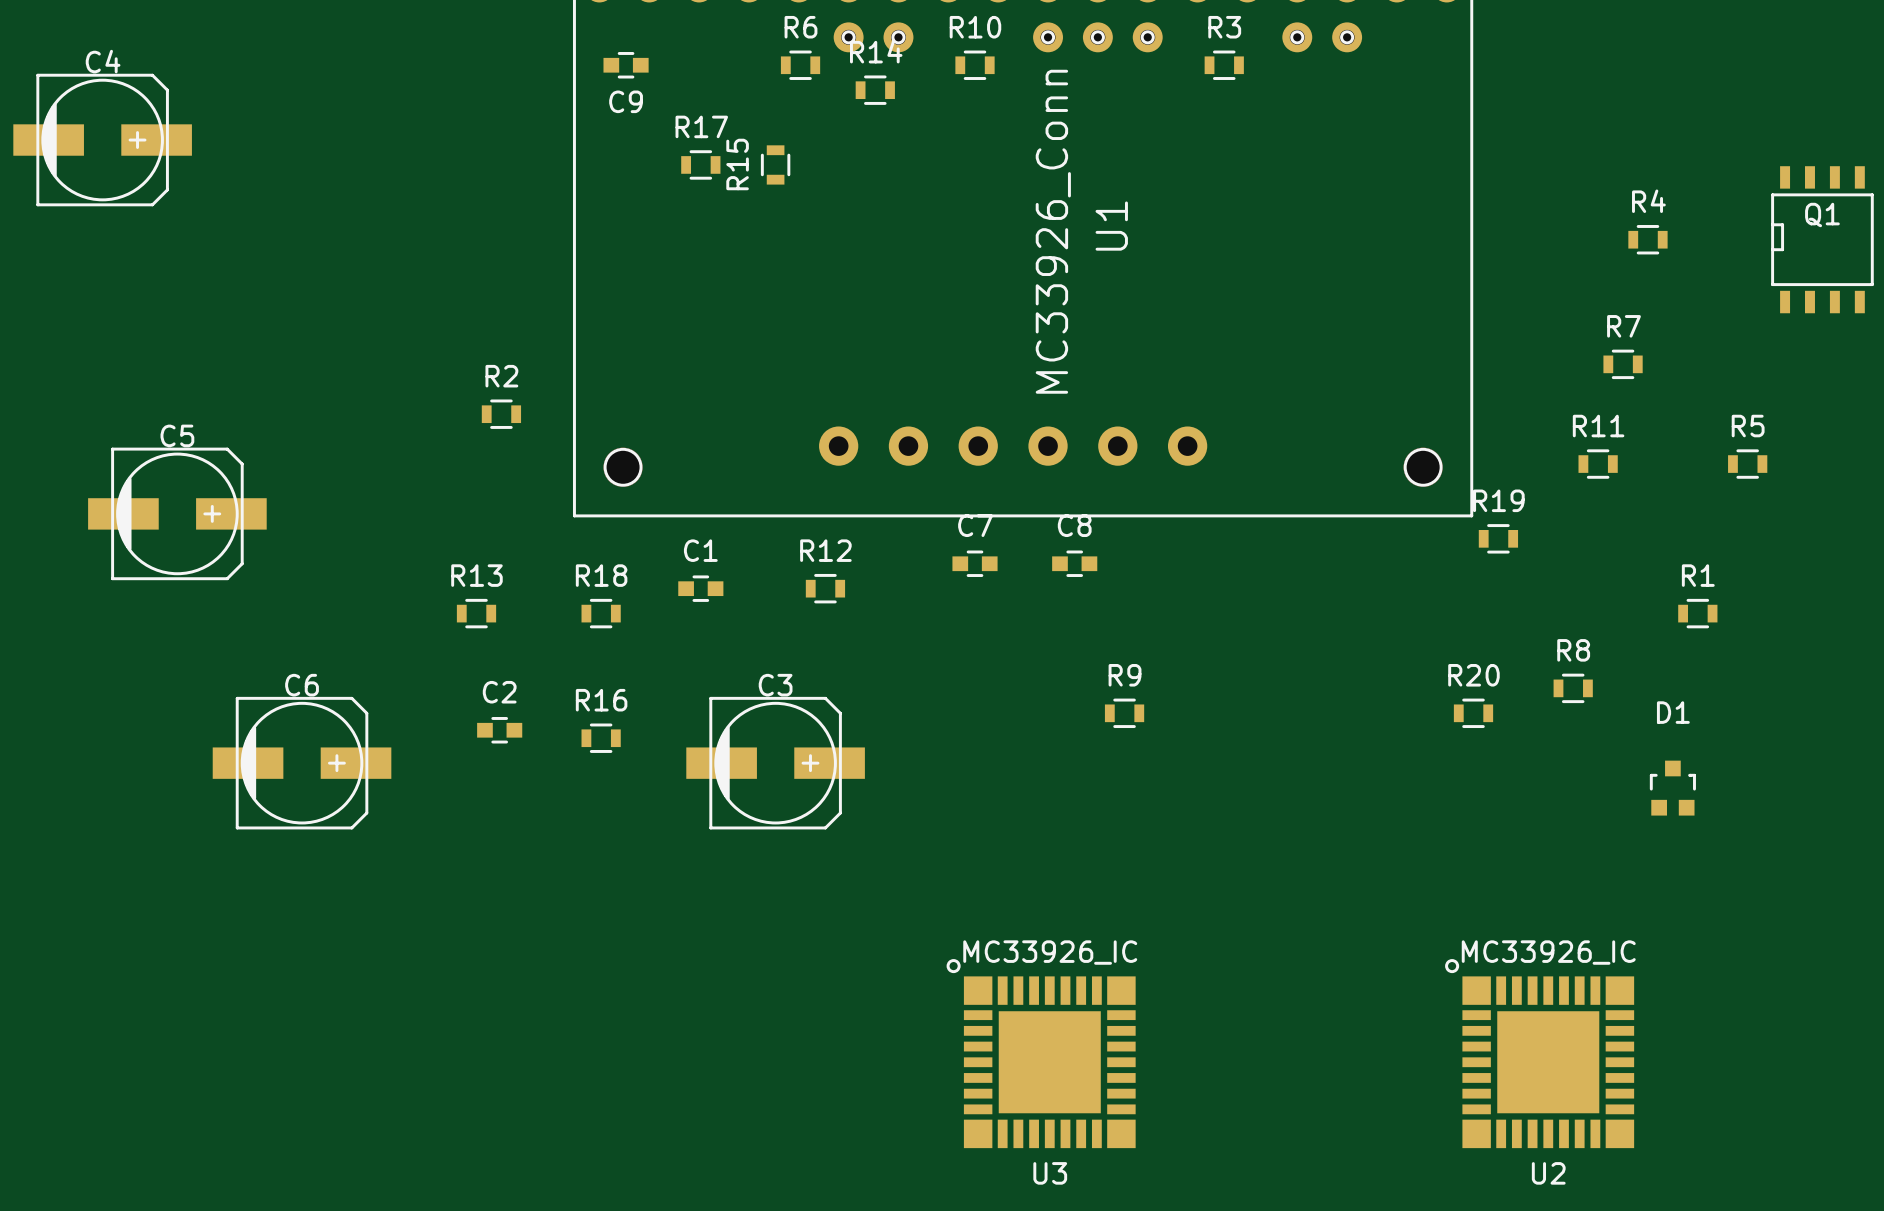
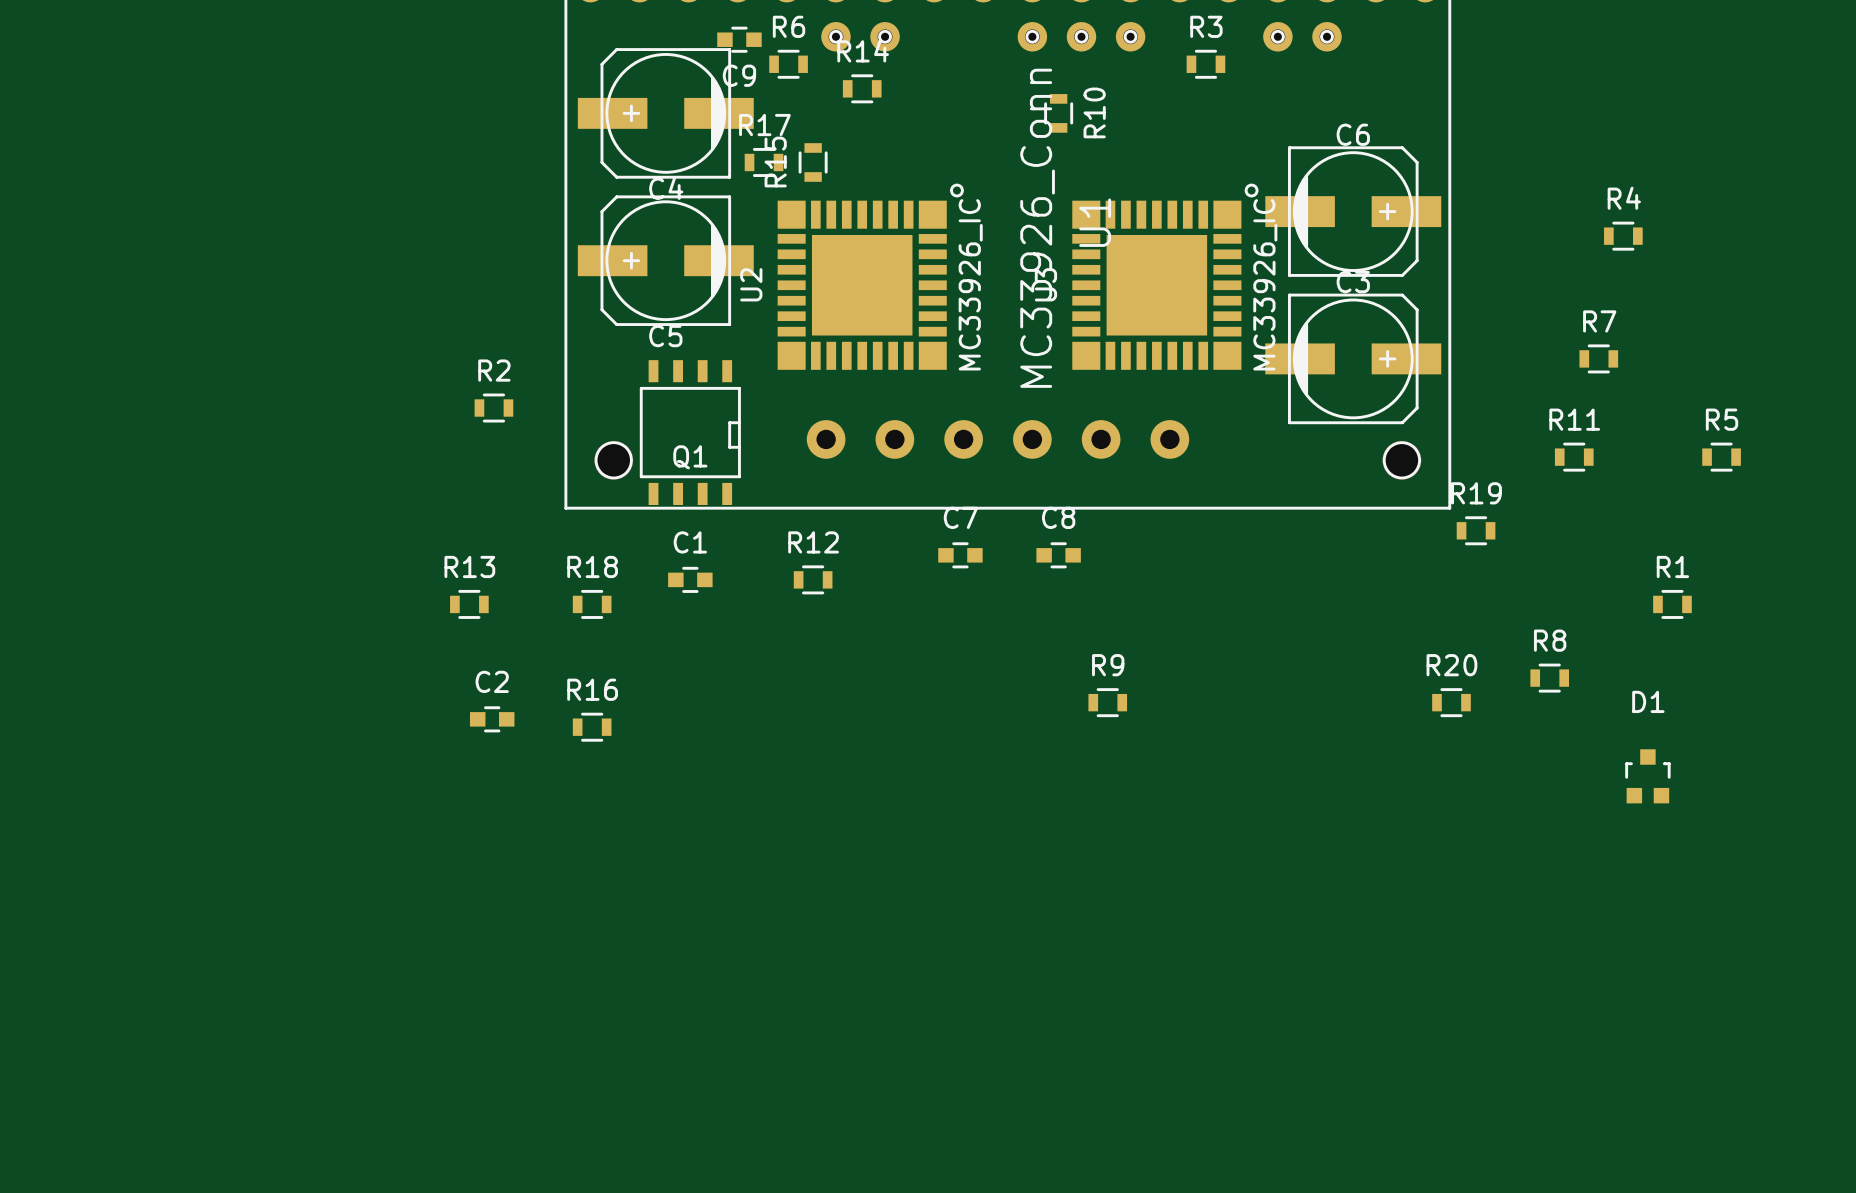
C9 position: (626, 65) -> (739, 39)
R10 rotation: 0° (975, 65) -> 90° clockwise (1058, 113)
R10 position: (975, 65) -> (1058, 113)
C4 rotation: 0° (102, 140) -> 180° (665, 113)
C4 position: (102, 140) -> (665, 113)
R17 position: (700, 164) -> (764, 162)
R15 position: (775, 164) -> (813, 162)
Q1 rotation: 0° (1822, 239) -> 180° (690, 432)
Q1 position: (1822, 239) -> (690, 432)
C5 rotation: 0° (177, 513) -> 180° (665, 260)
C5 position: (177, 513) -> (665, 260)
C6 position: (302, 763) -> (1353, 211)
C3 position: (775, 763) -> (1353, 358)
U3 rotation: 0° (1041, 1053) -> 90° clockwise (1165, 276)
U3 position: (1041, 1053) -> (1165, 276)
U2 rotation: 0° (1539, 1053) -> 90° clockwise (870, 276)
U2 position: (1539, 1053) -> (870, 276)

